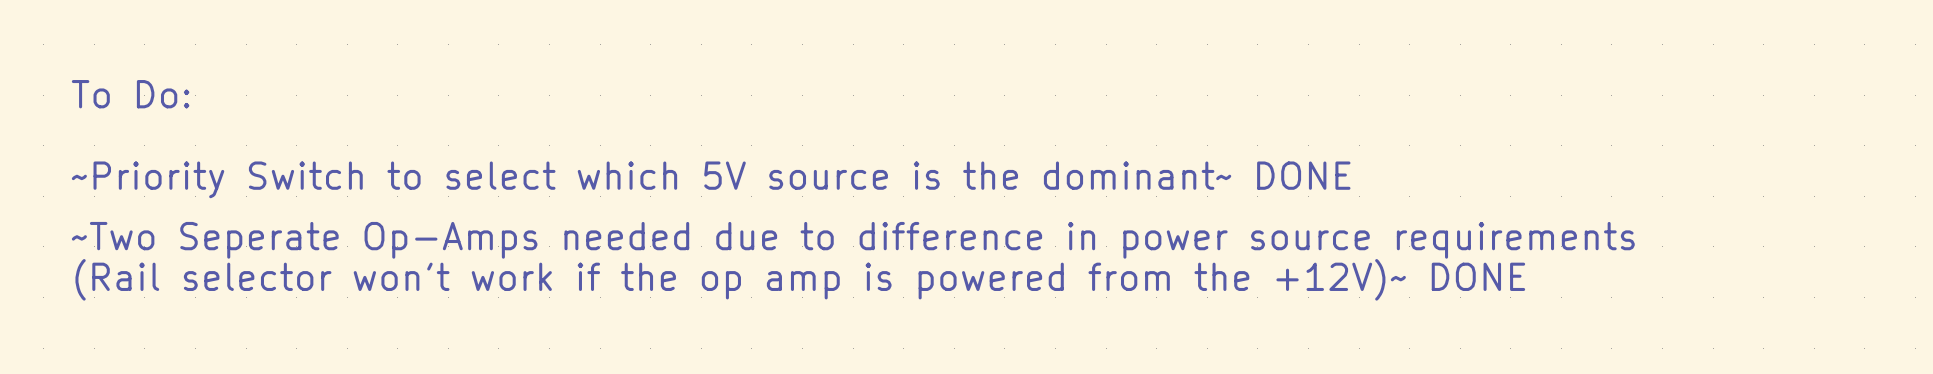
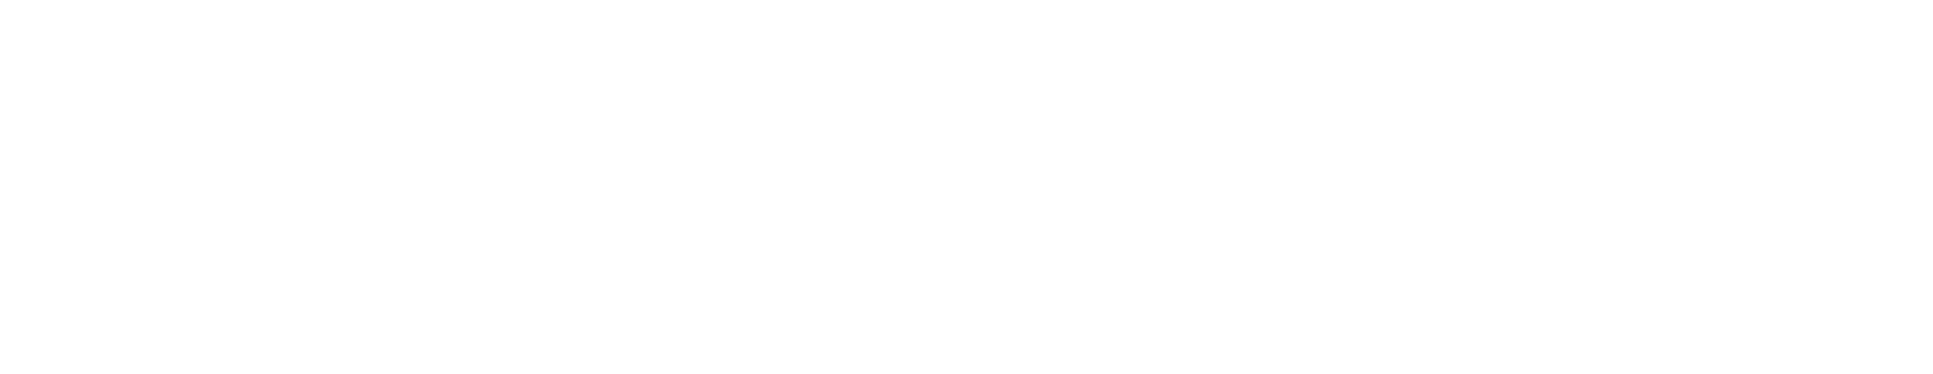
text: To Do: (130, 94) -> none
text: ~Priority Switch to select which 5V source is the dominant~ DONE (711, 179) -> none
text: ~Two Seperate Op-Amps needed due to difference in power source requirements (853, 240) -> none
text: (Rail selector won't work if the op amp is powered from the +12V)~ DONE (800, 279) -> none

